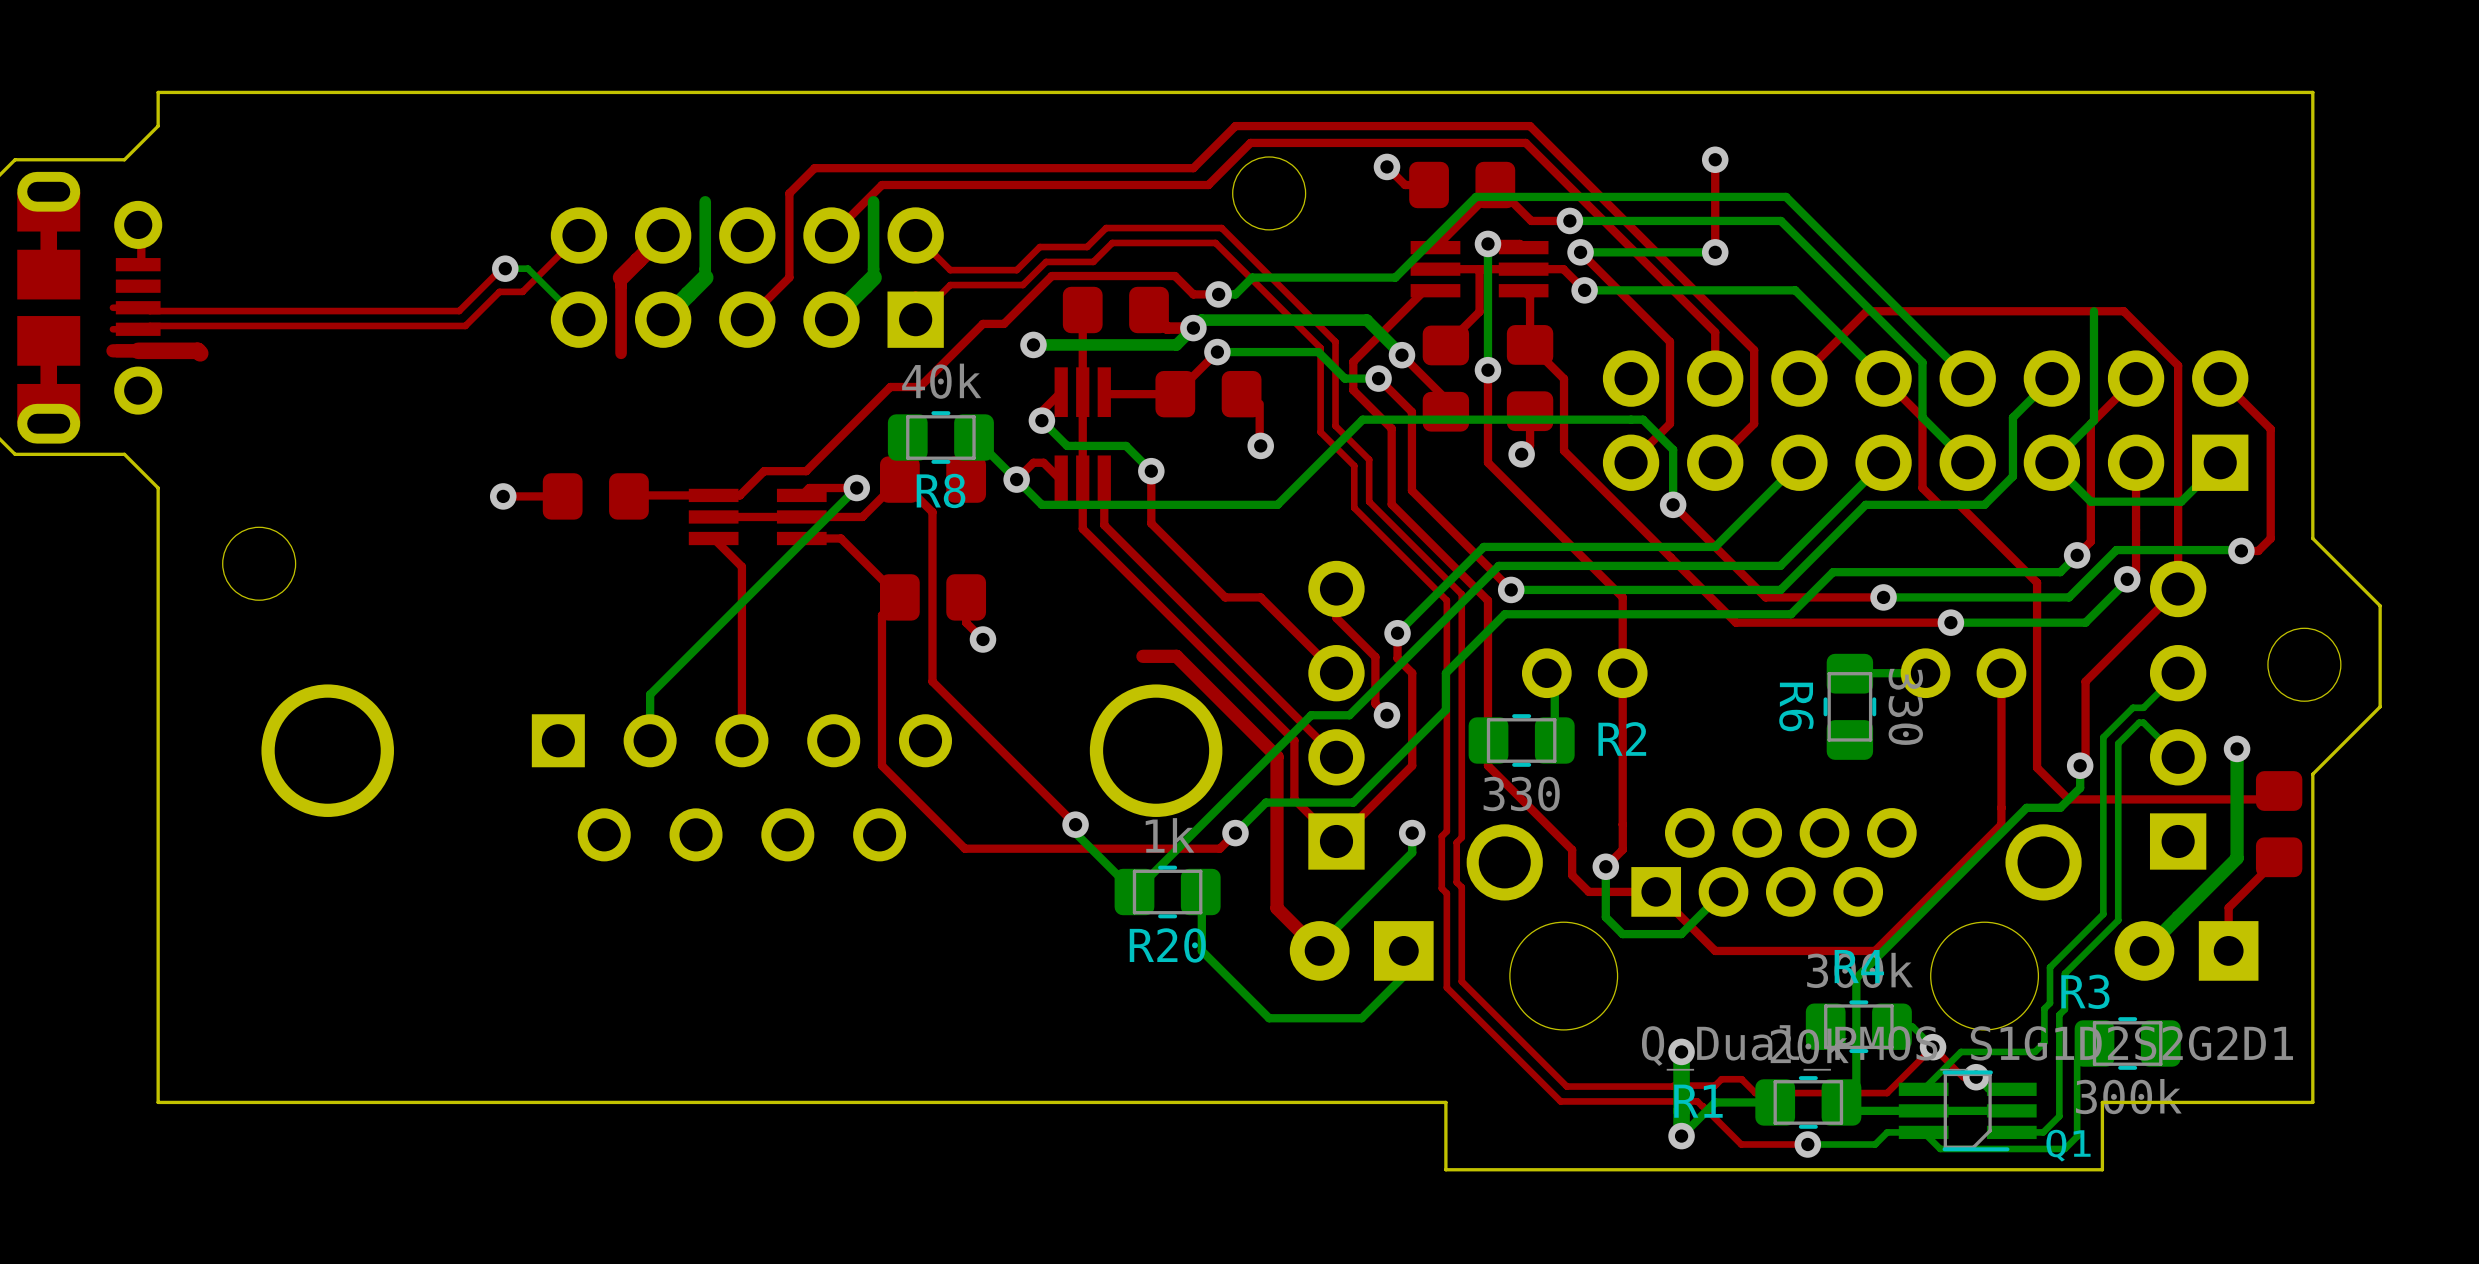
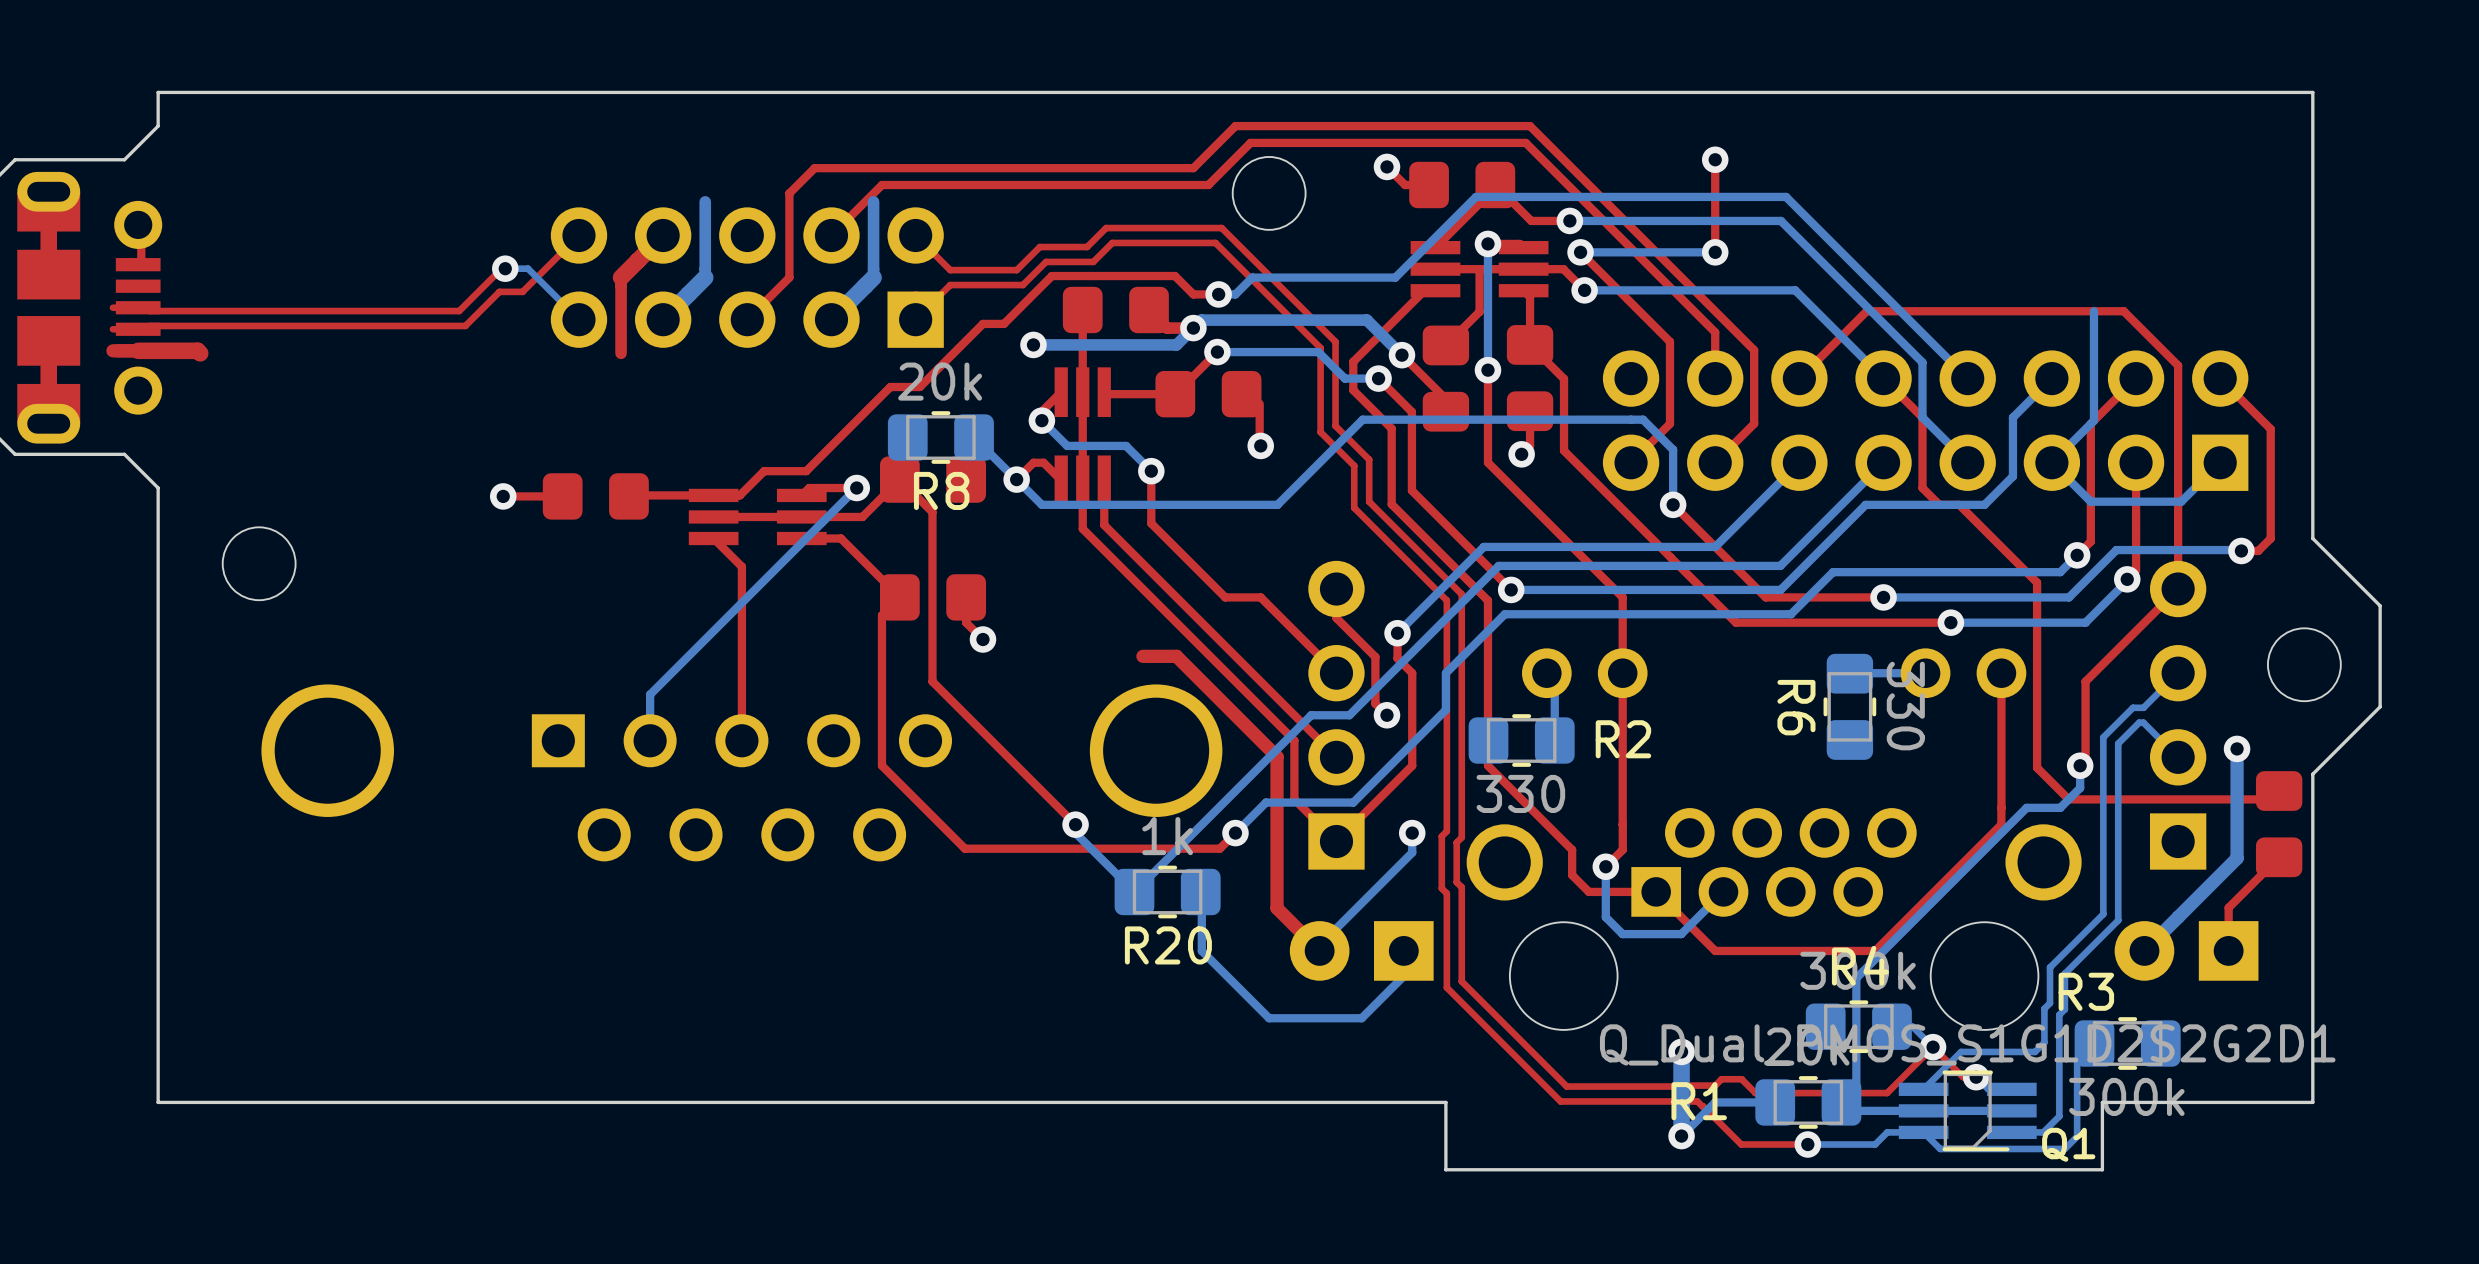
R8 value: 40k (941, 381) -> 20k (940, 381)

